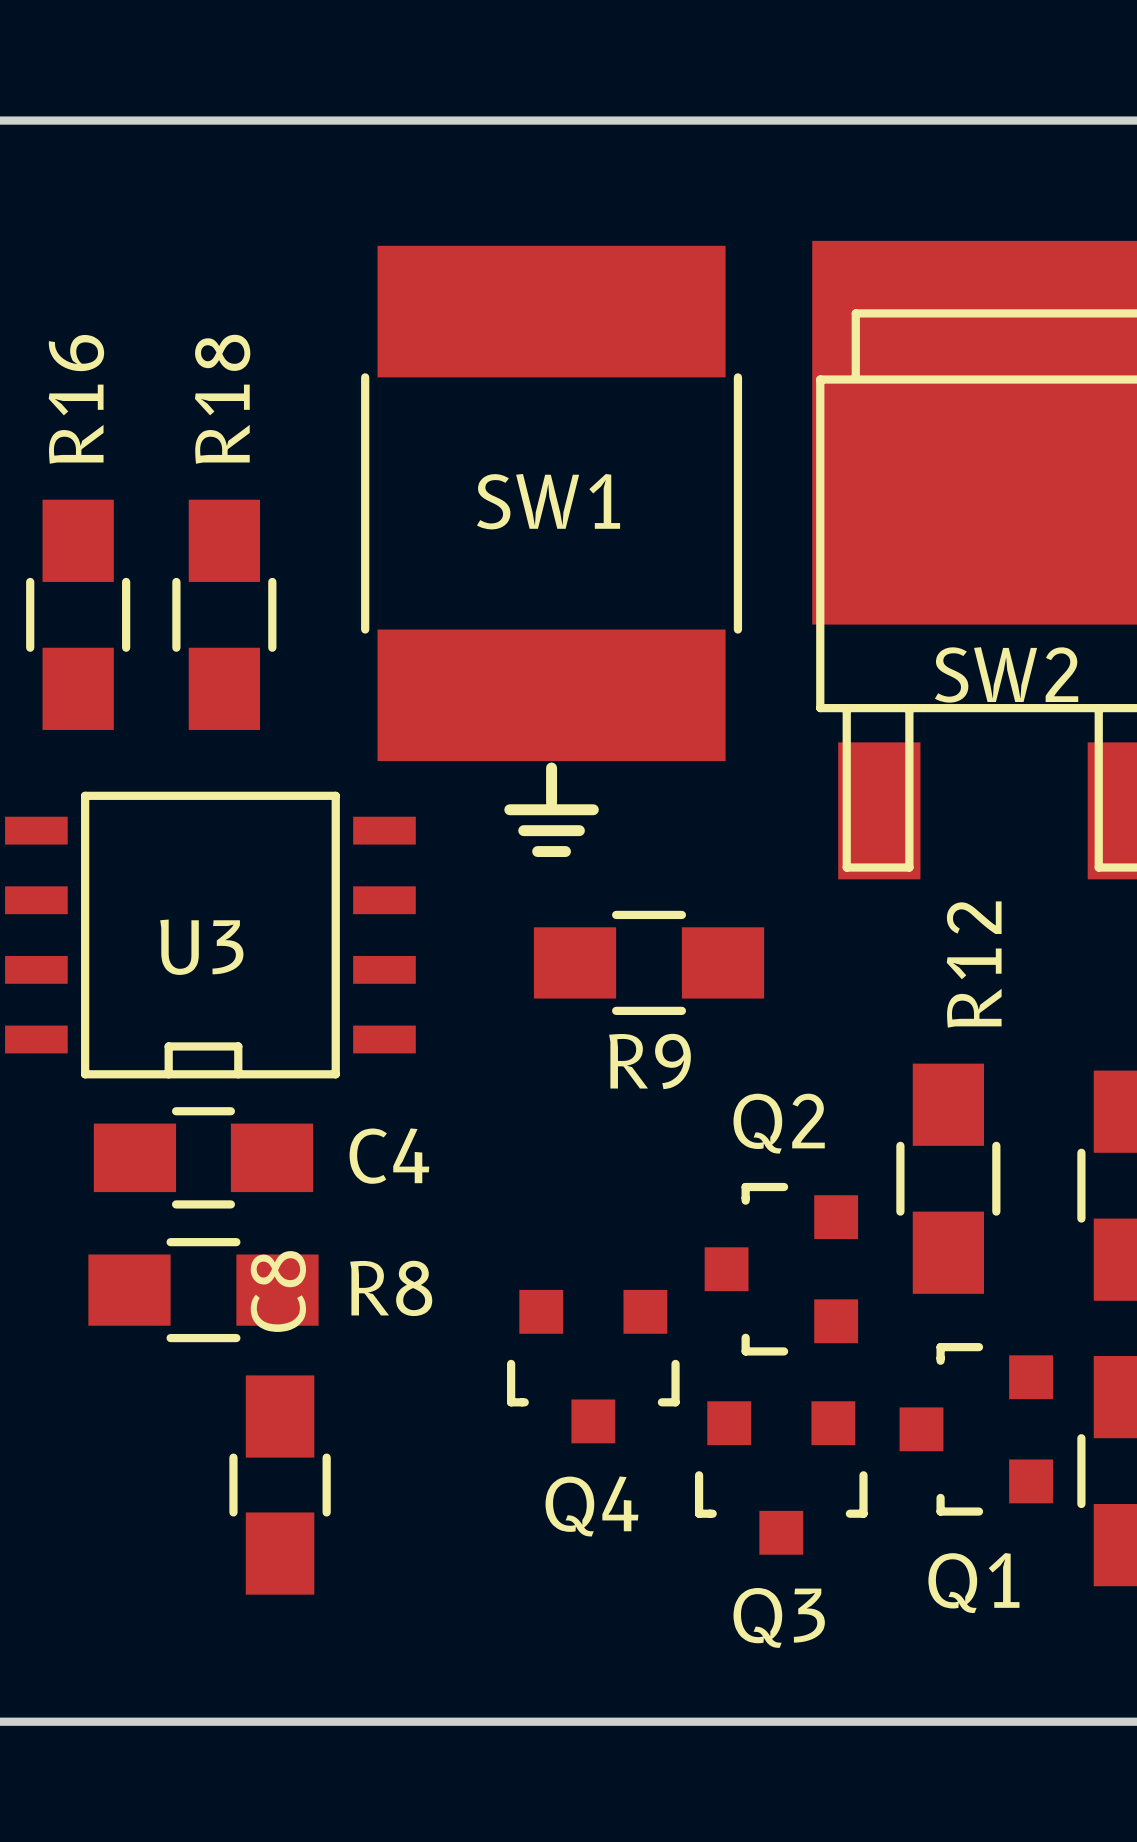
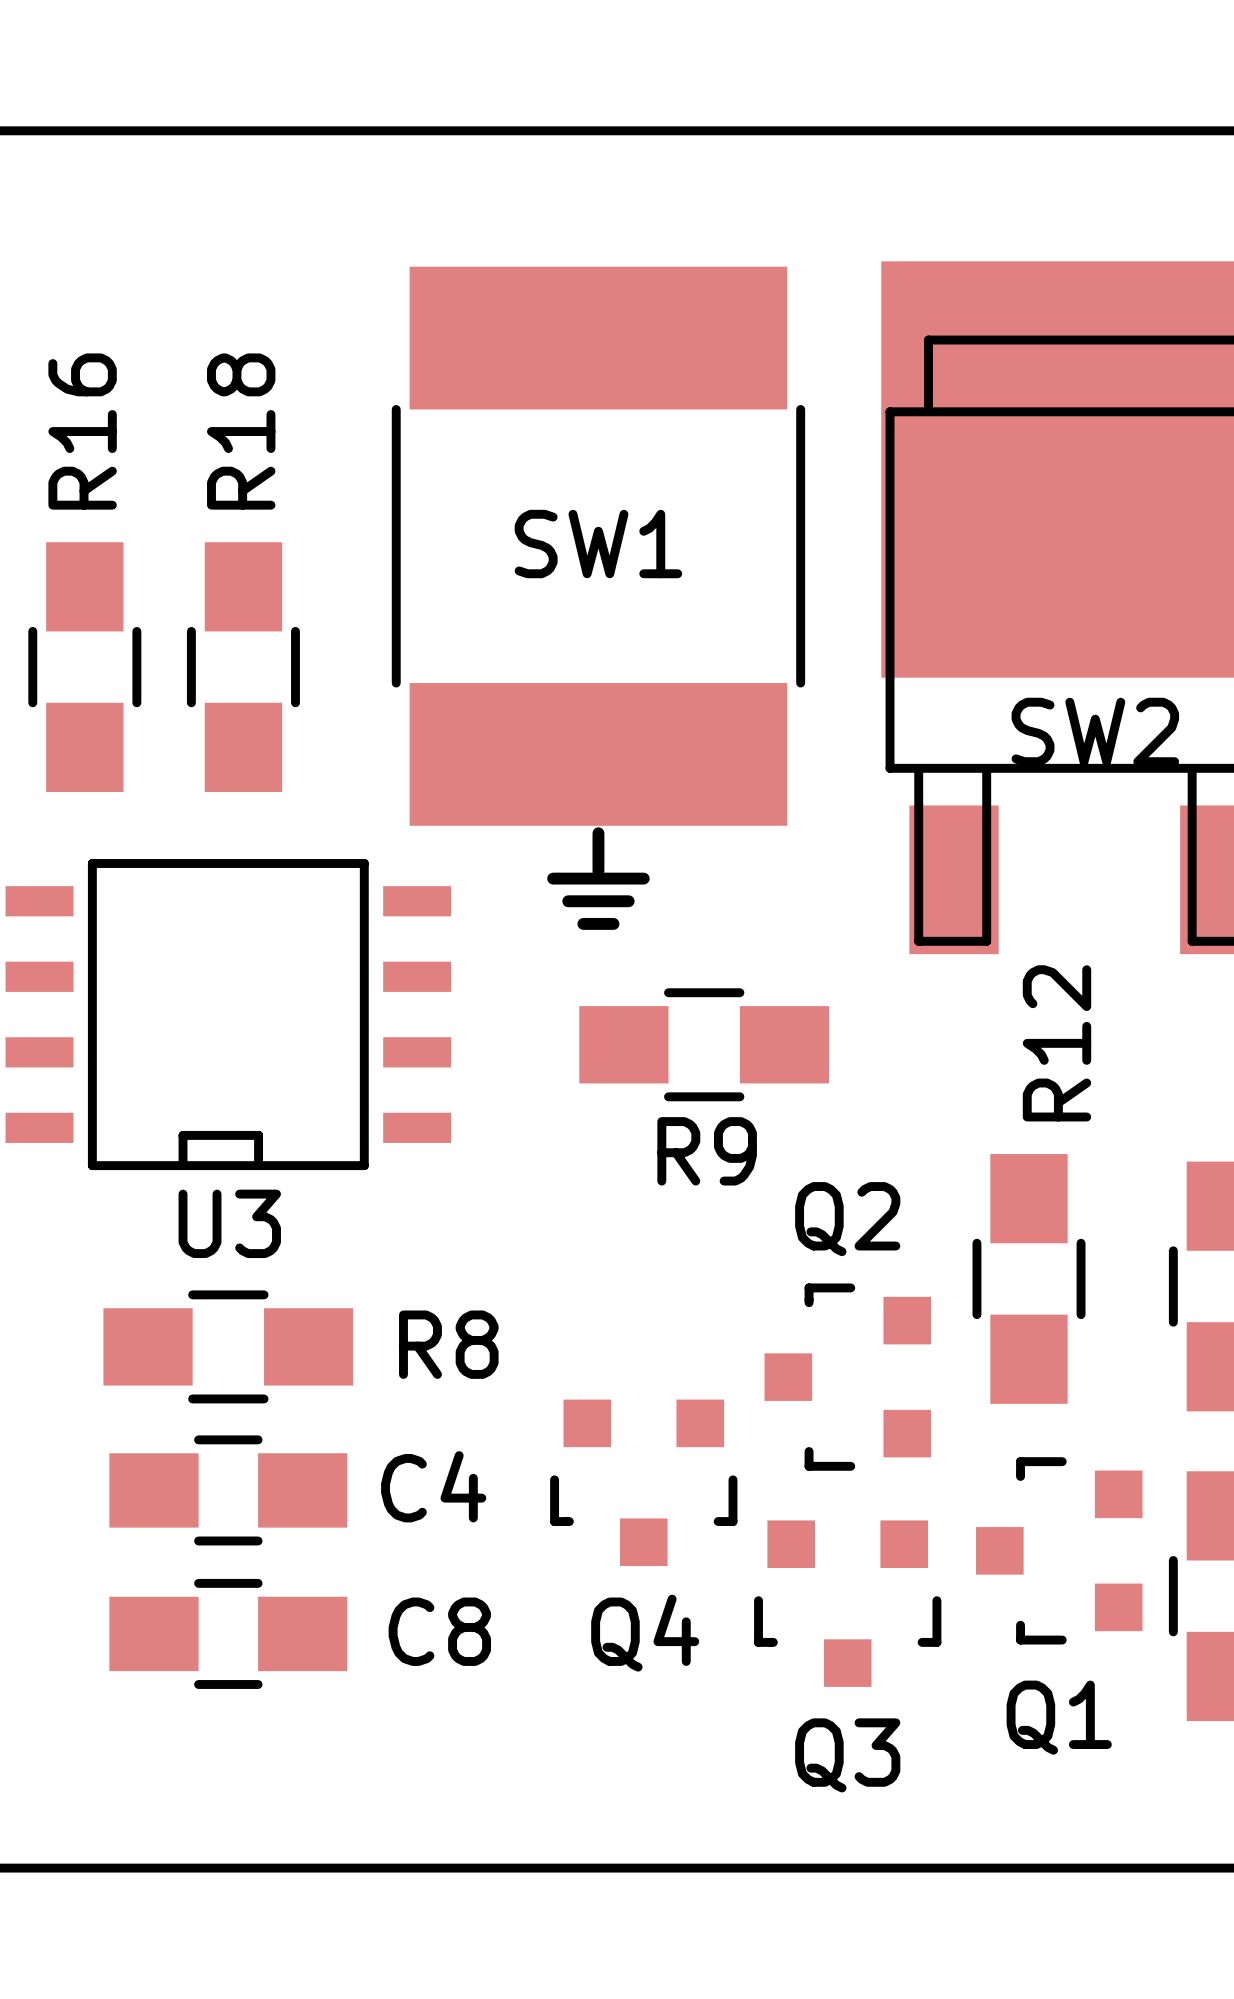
U3 name position: U3 (201, 947) -> U3 (229, 1223)
C4 position: (203, 1157) -> (228, 1490)
R8 name position: R8 (391, 1288) -> R8 (448, 1344)
R8 position: (203, 1290) -> (228, 1346)
C8 rotation: 0° (280, 1485) -> 90° clockwise (228, 1633)

